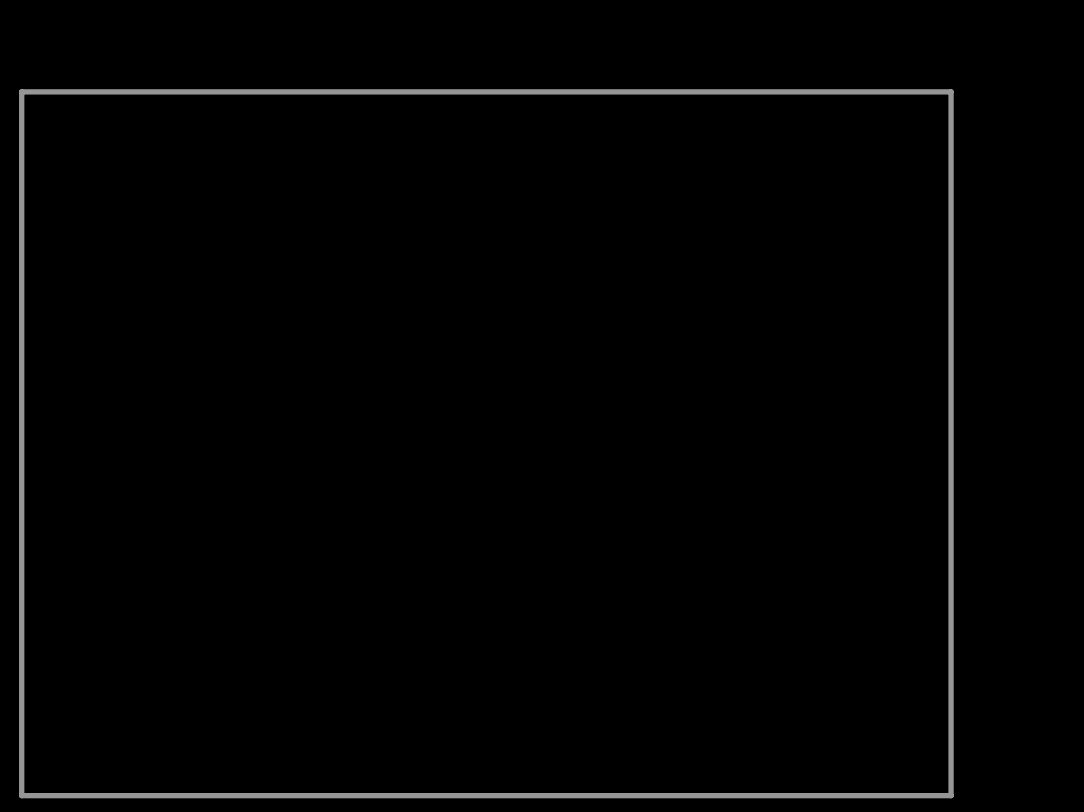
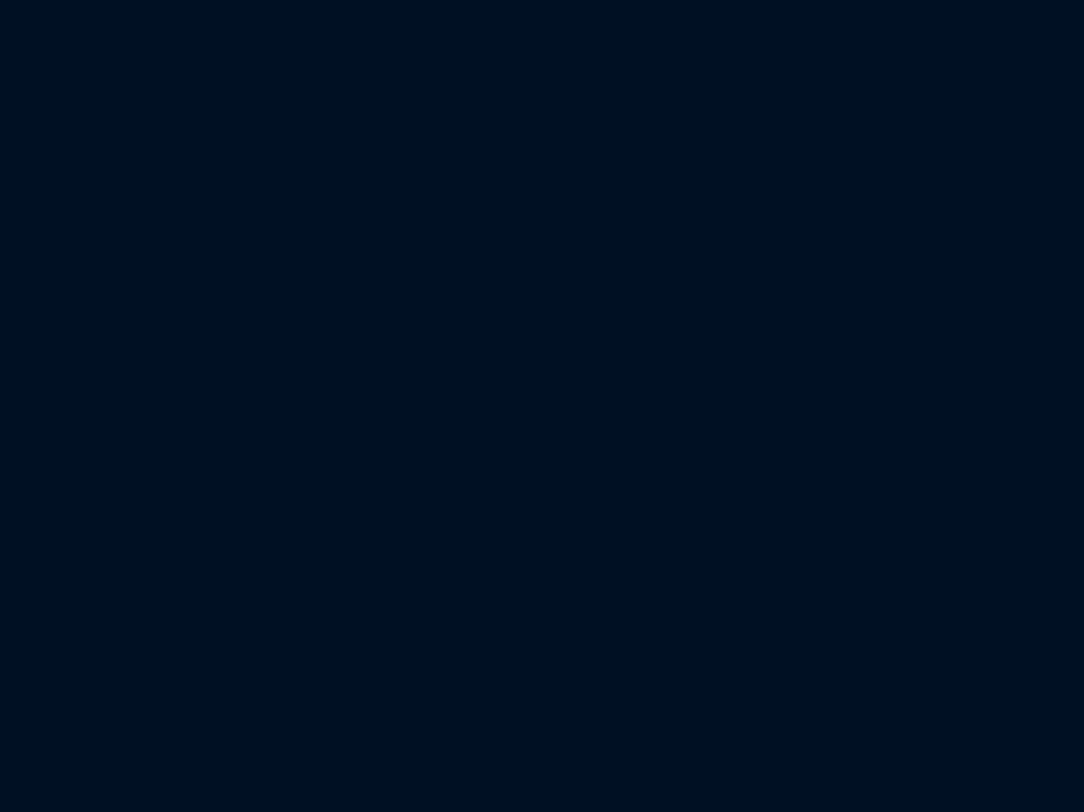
line: (21, 91) (951, 91) (951, 795) (21, 795) (21, 91) -> none

